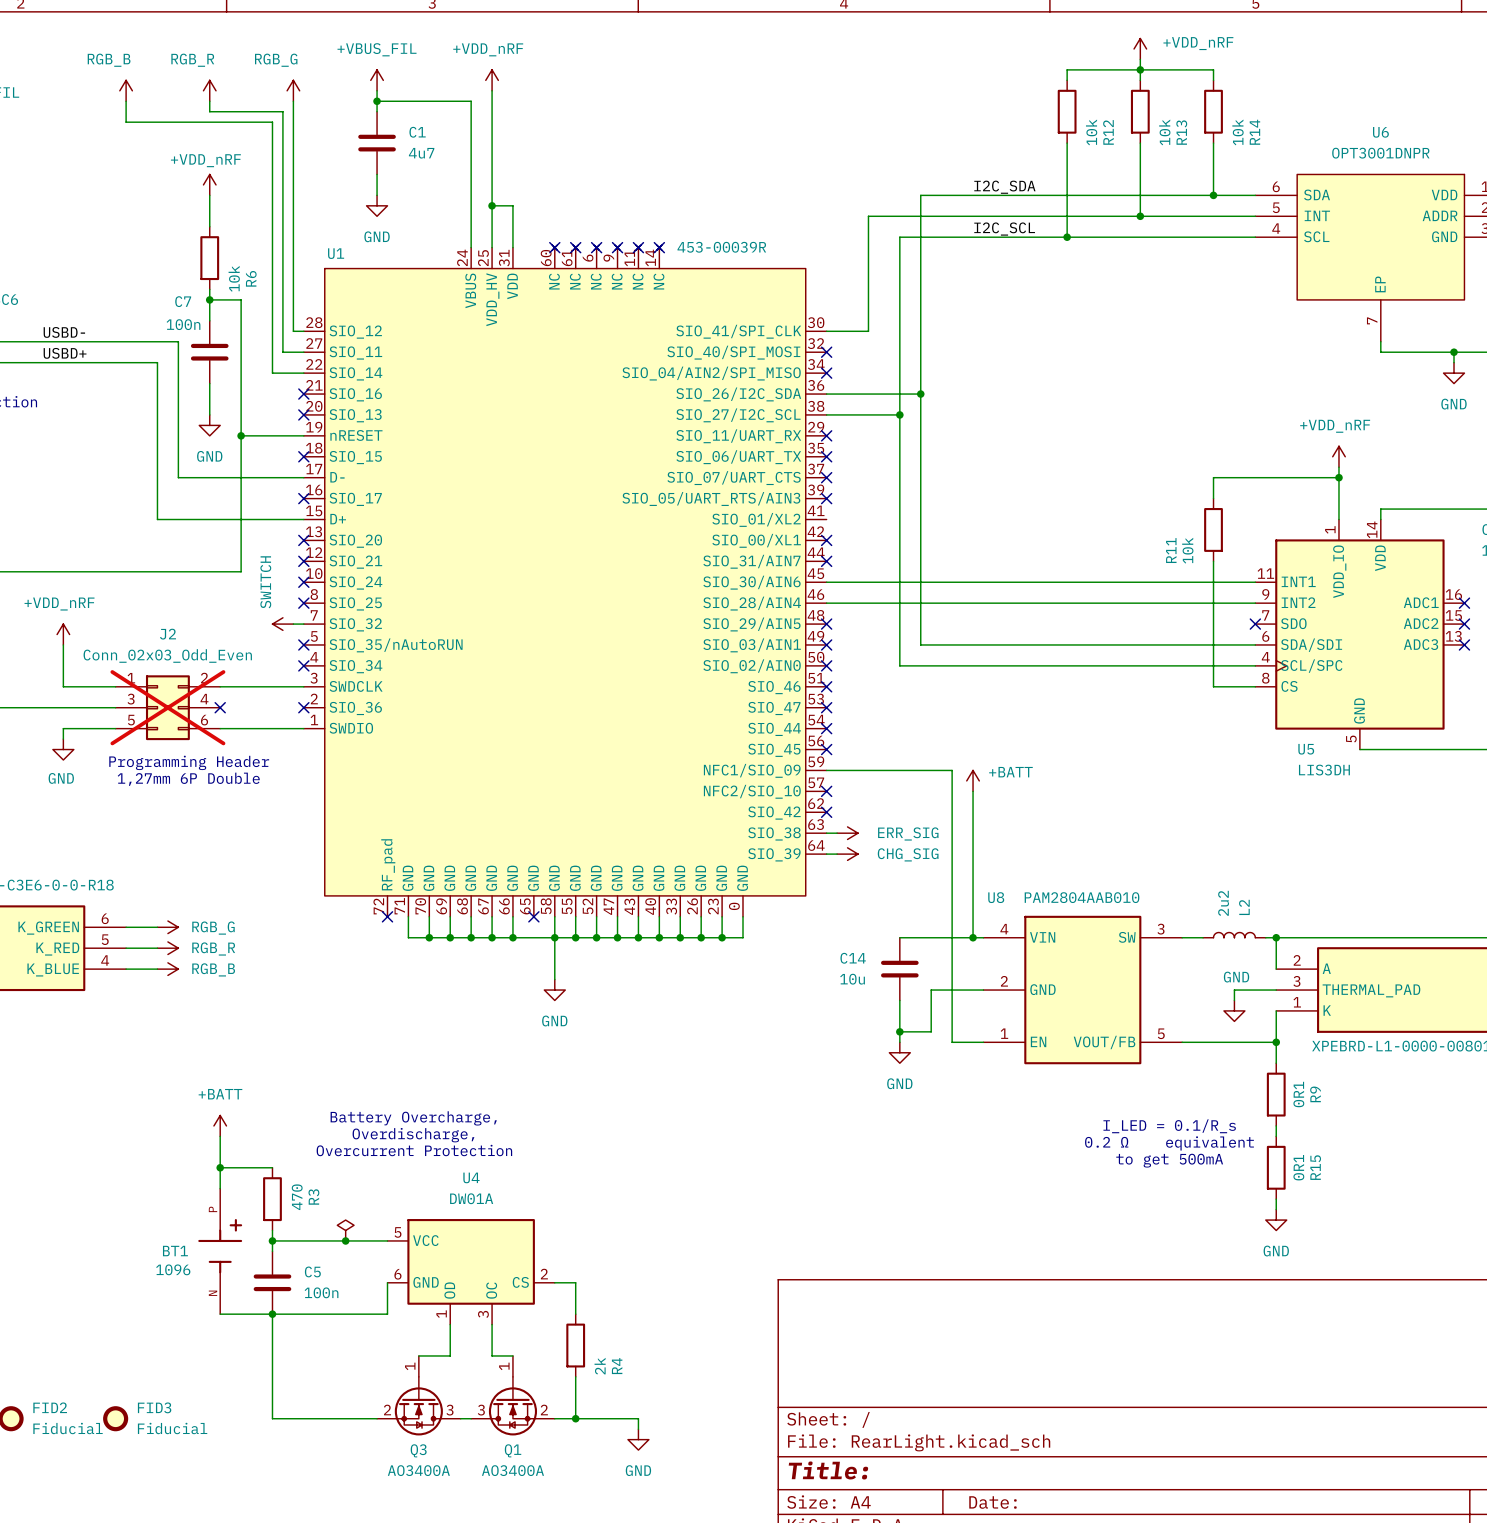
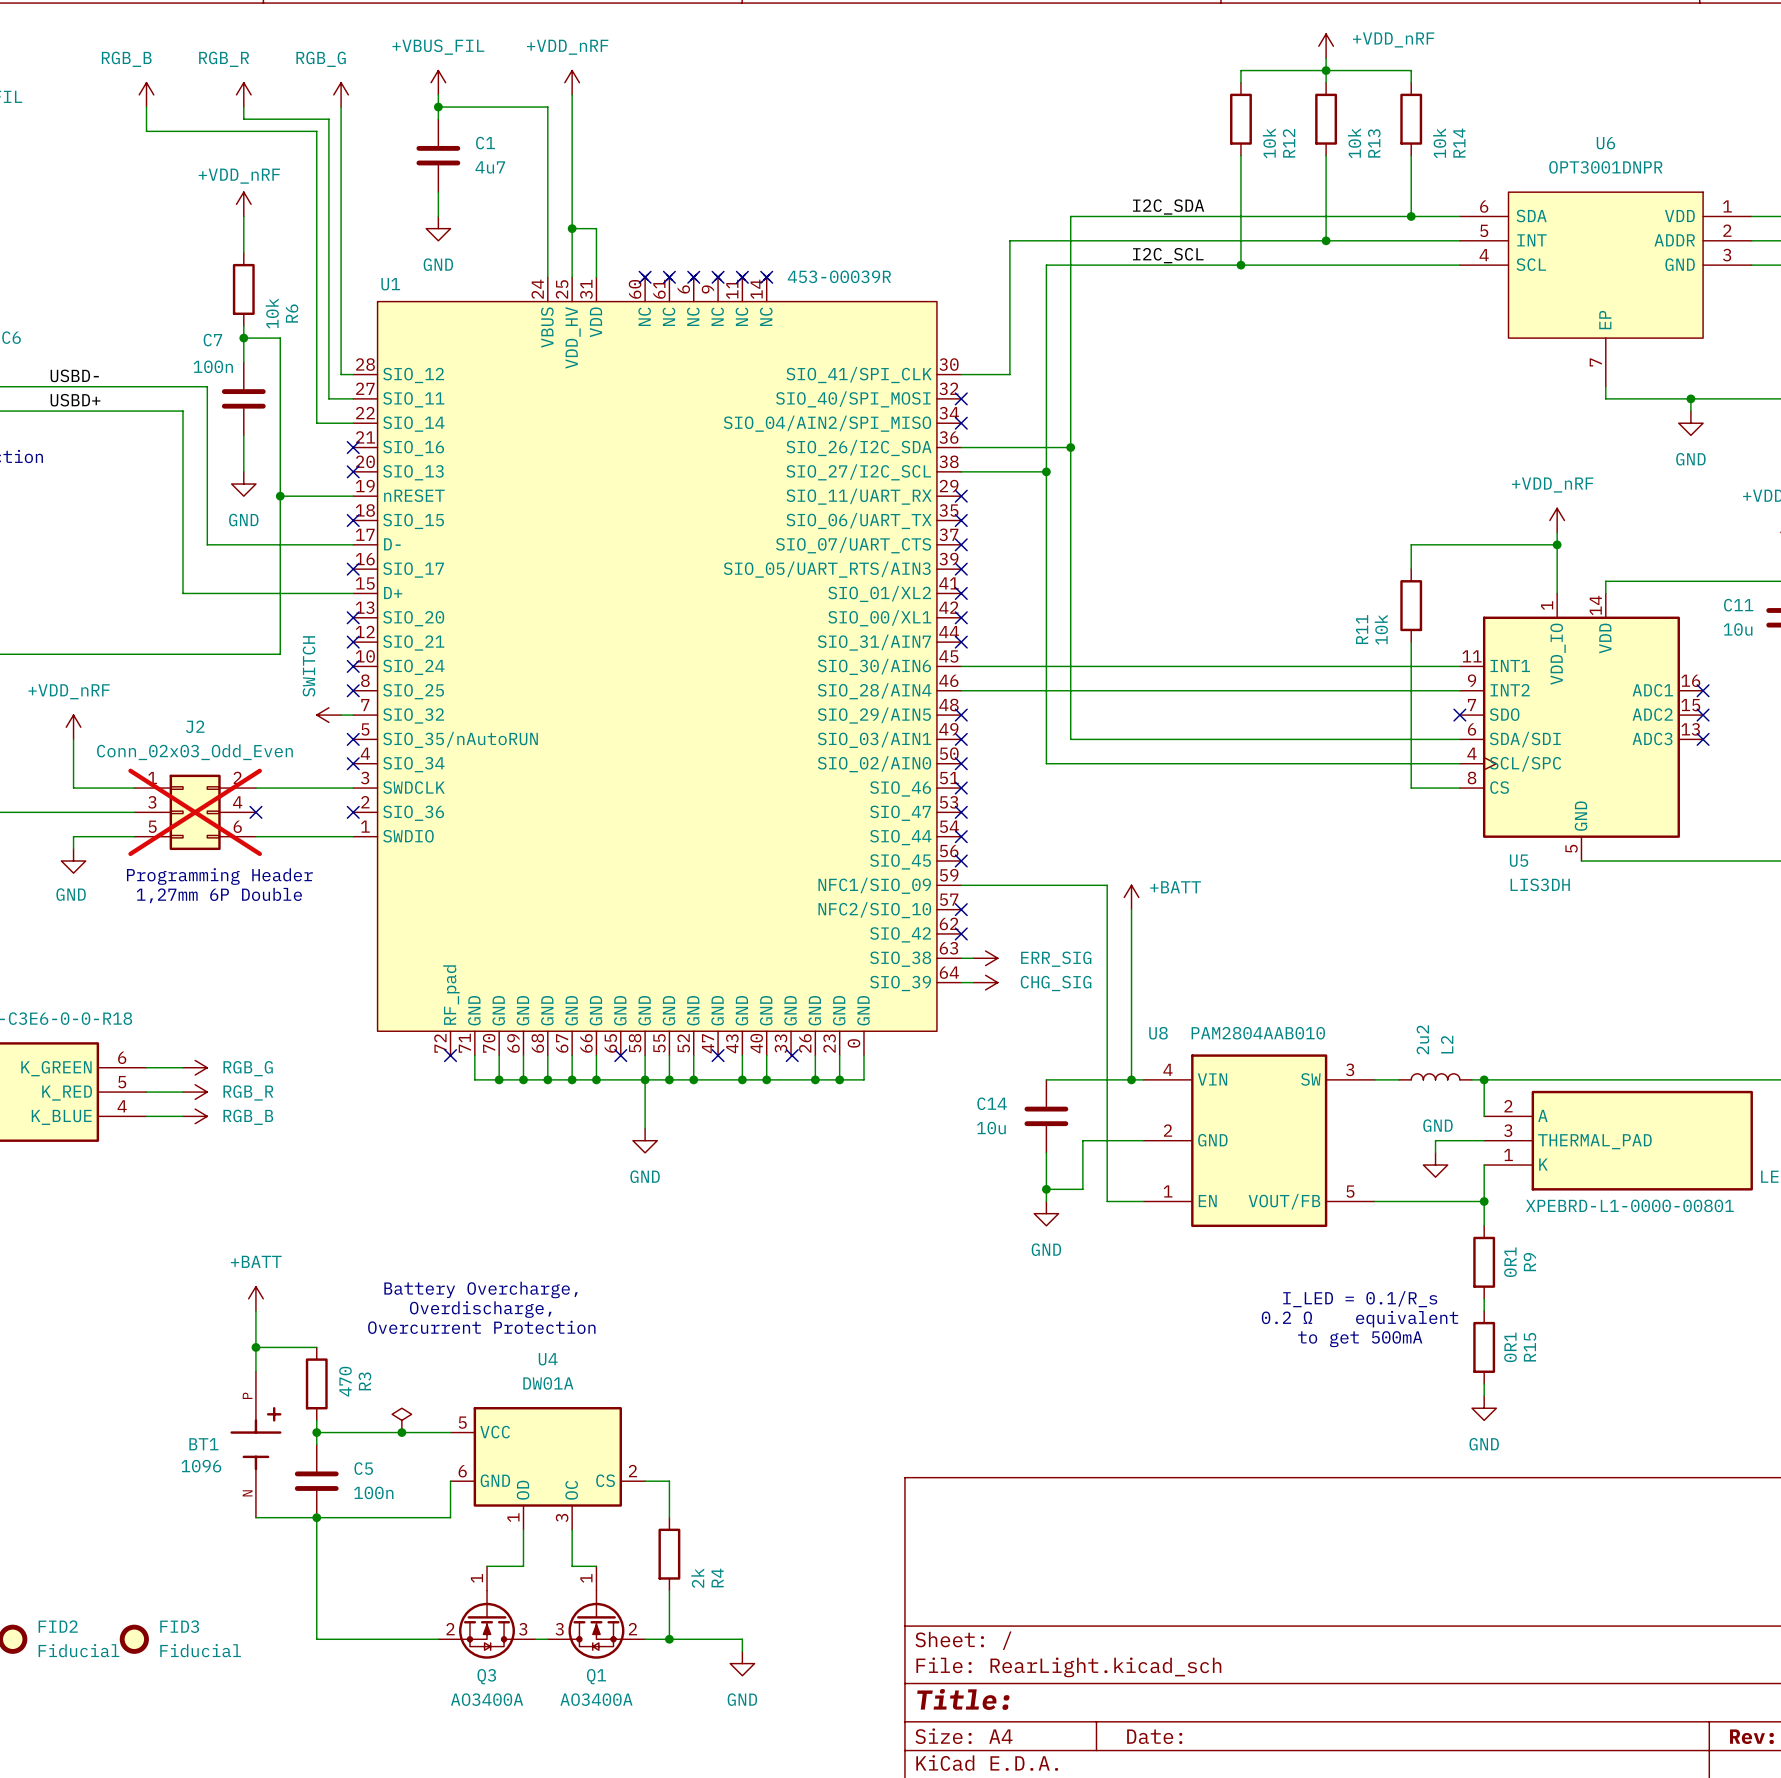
no-connect mark: none -> (961, 593)
wire: (617, 916) (617, 937) -> none
no-connect mark: none -> (718, 1055)
wire: (680, 916) (680, 937) -> none
no-connect mark: none -> (792, 1055)
junction: (617, 937) -> none
junction: (680, 937) -> none

